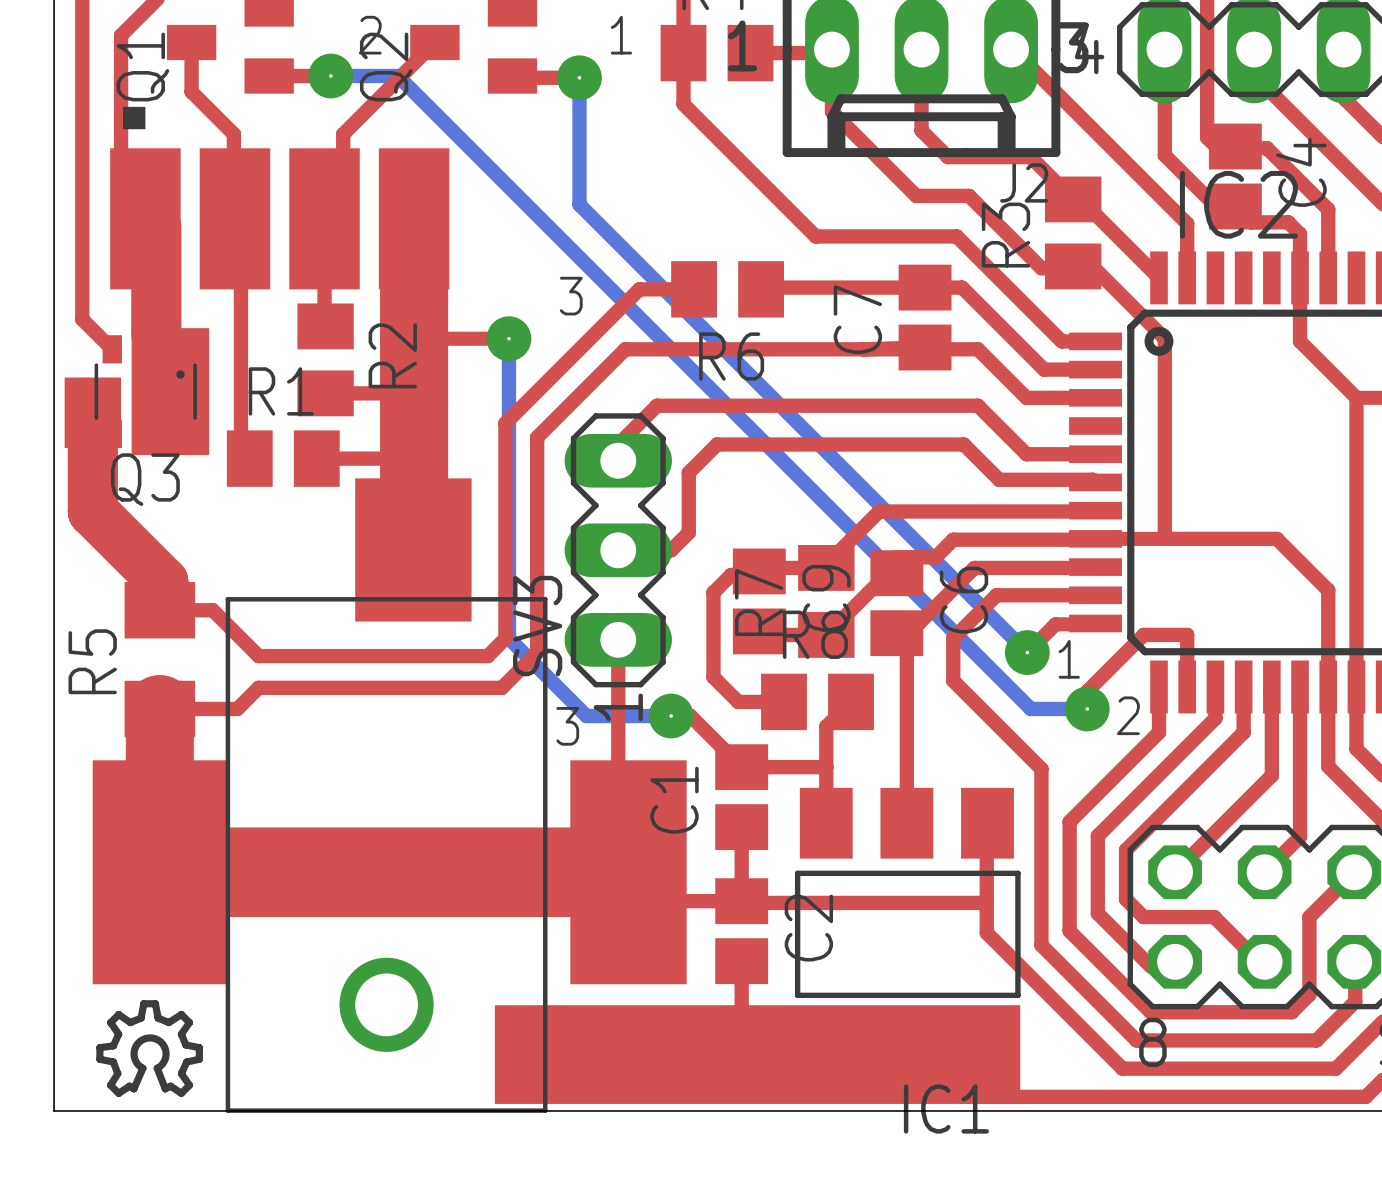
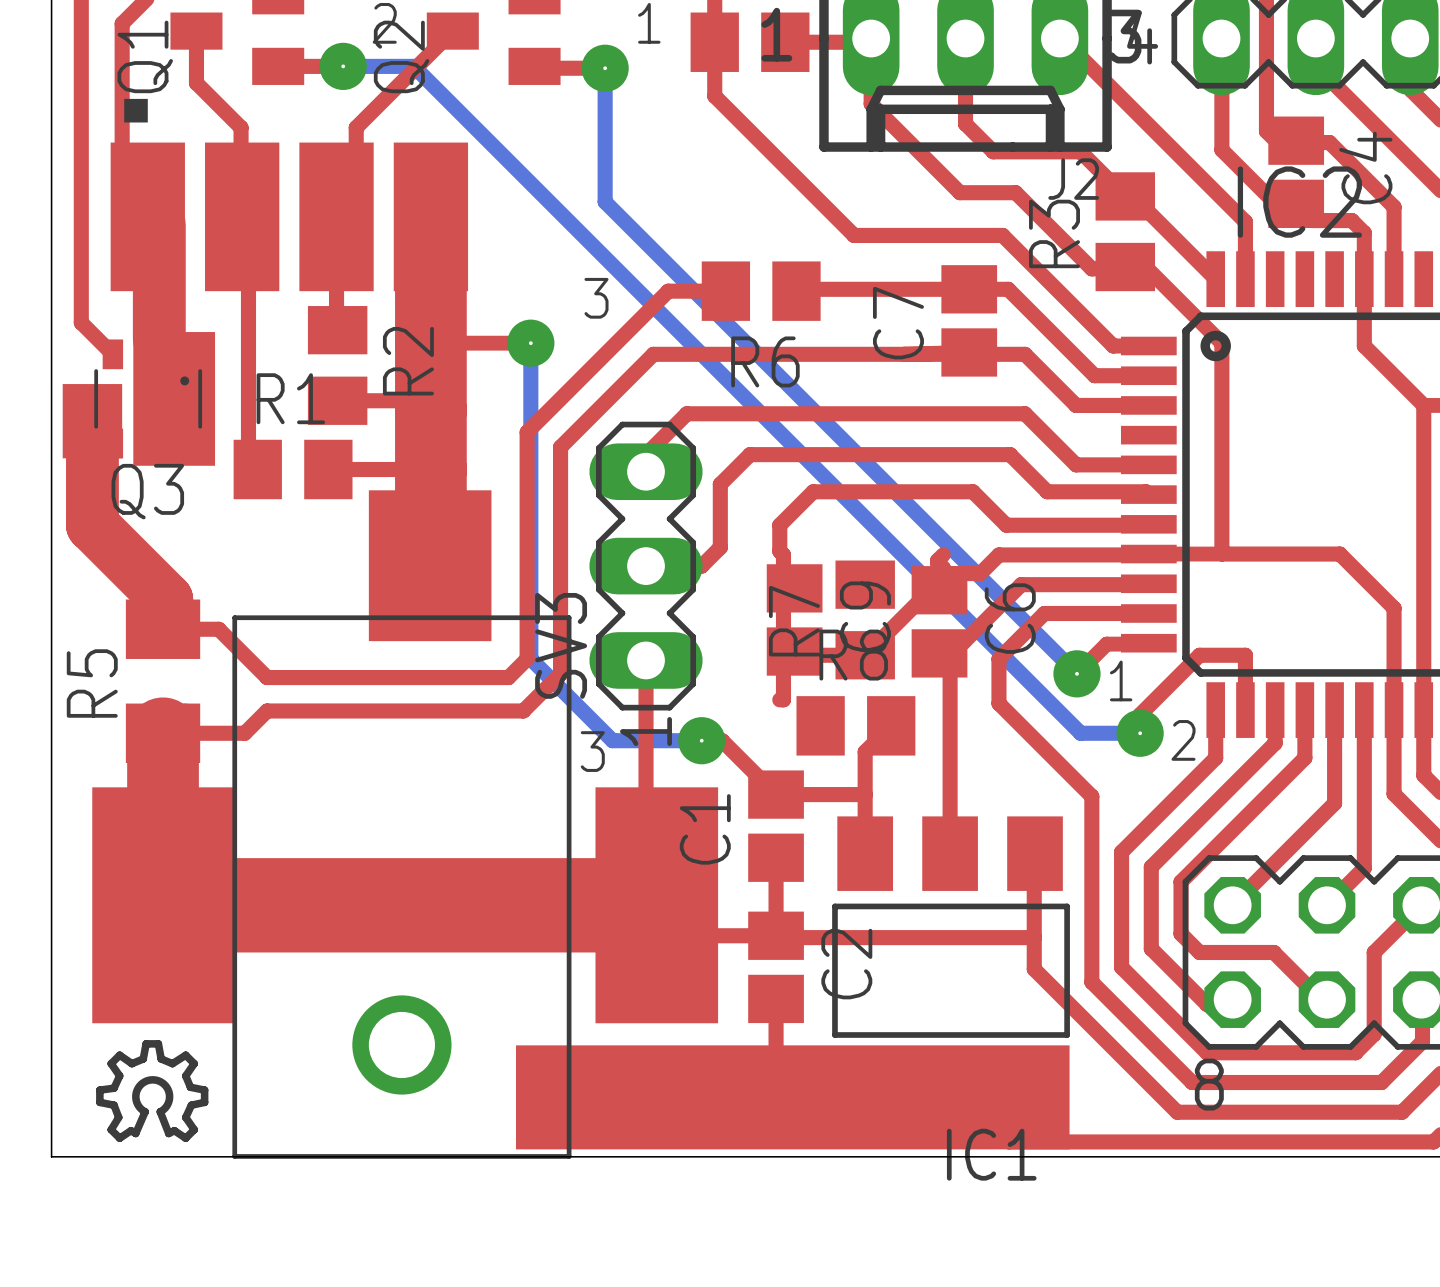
top track: (960, 511) (879, 511) (826, 564) (826, 567) (762, 567) (755, 574) (731, 574) (713, 592) (713, 677) (738, 701) (784, 701) -> (1006, 525) (972, 491) (813, 491) (779, 525) (779, 551) (783, 554) (783, 699) (779, 699)
top track: none -> (943, 554) (937, 560) (937, 573) (943, 567) (941, 573)

